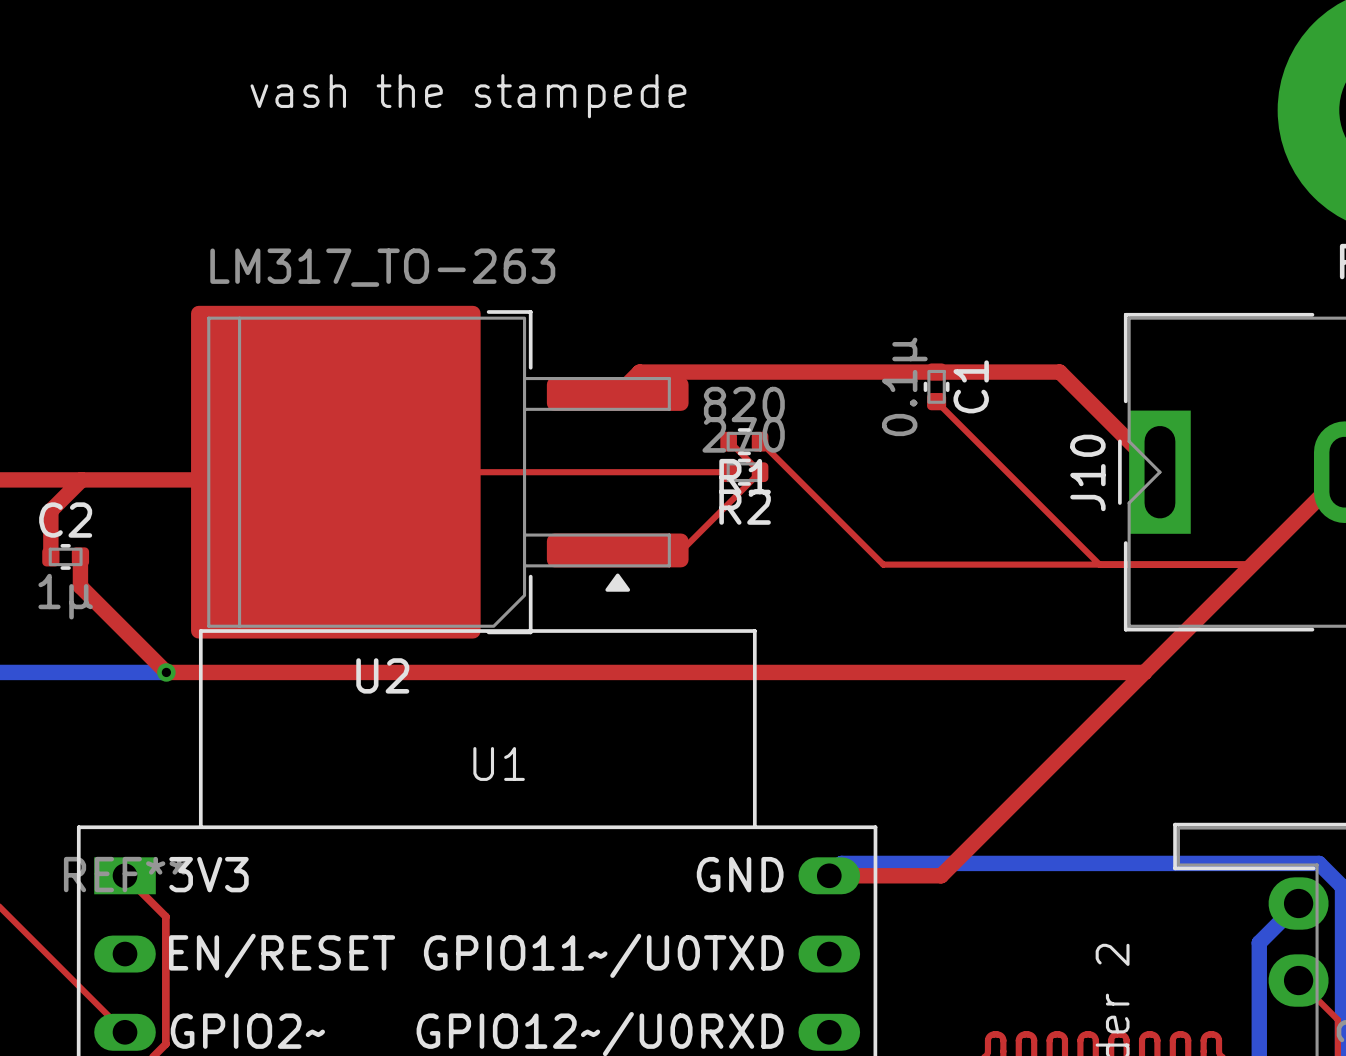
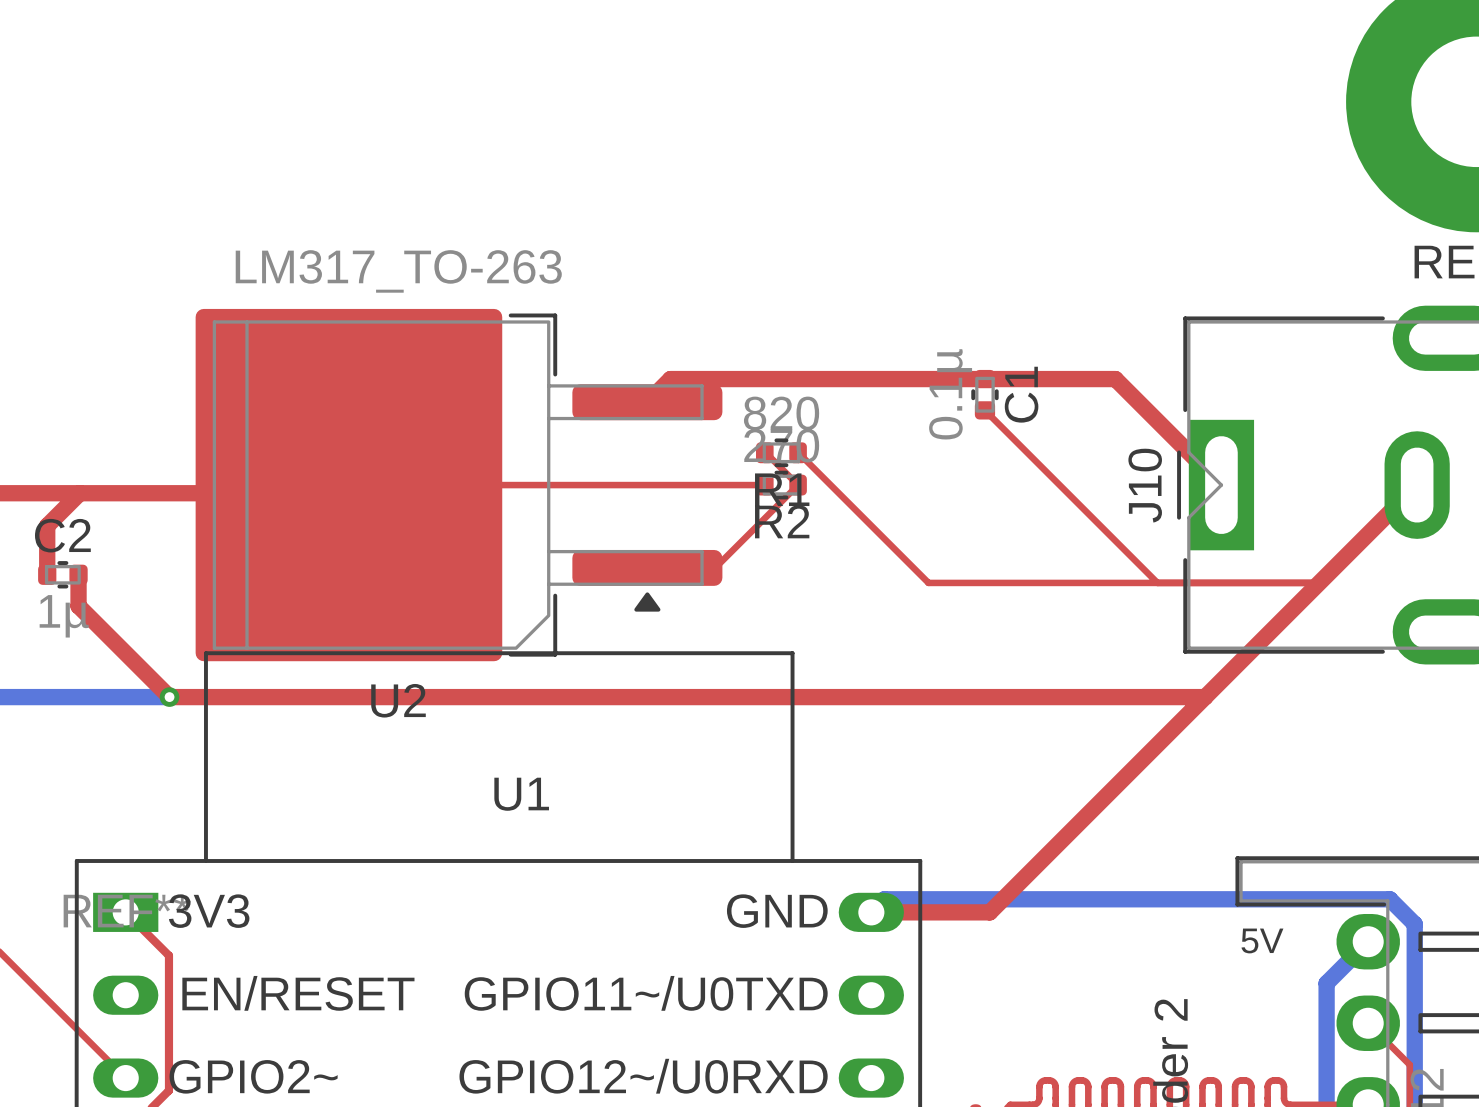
text: vash the stampede (468, 96) -> none
text: none -> 5V (1262, 940)

